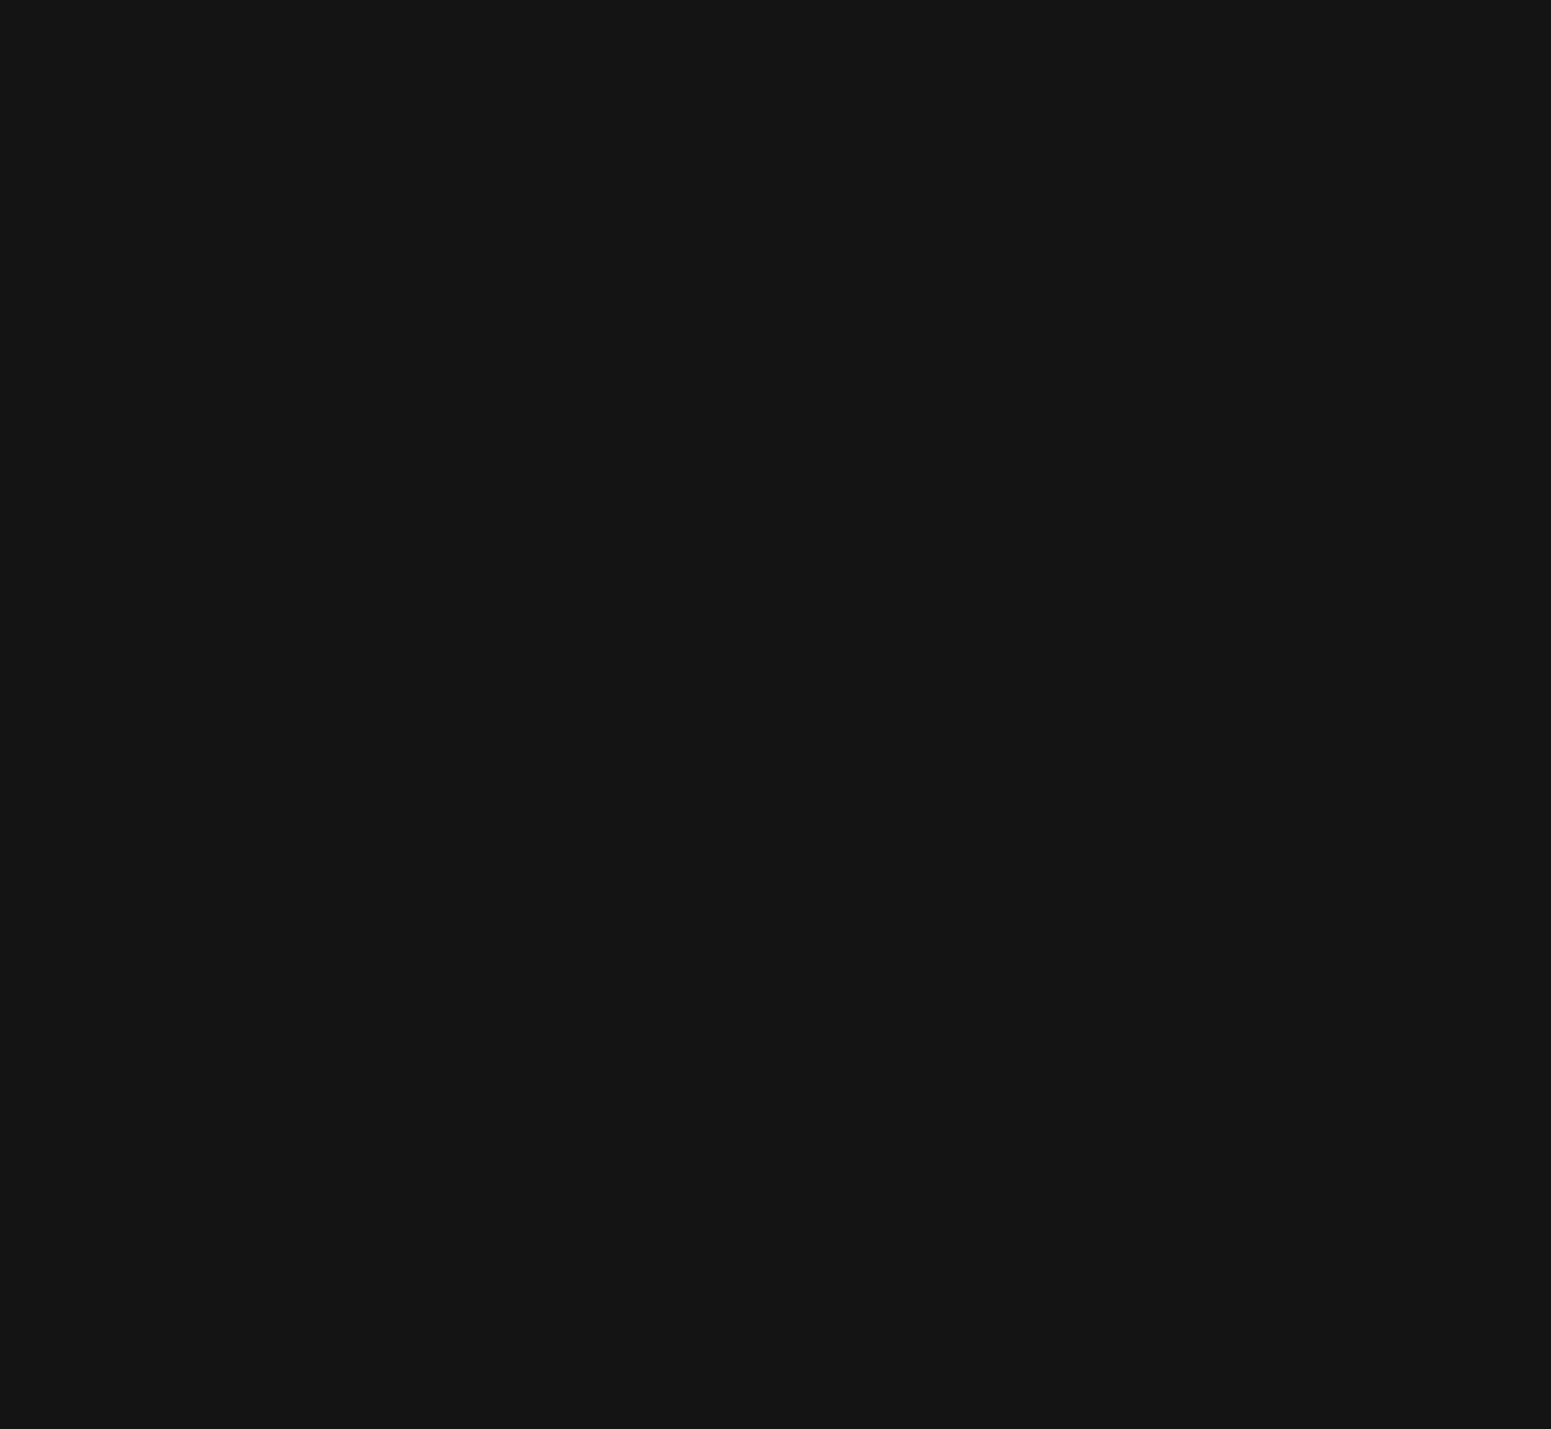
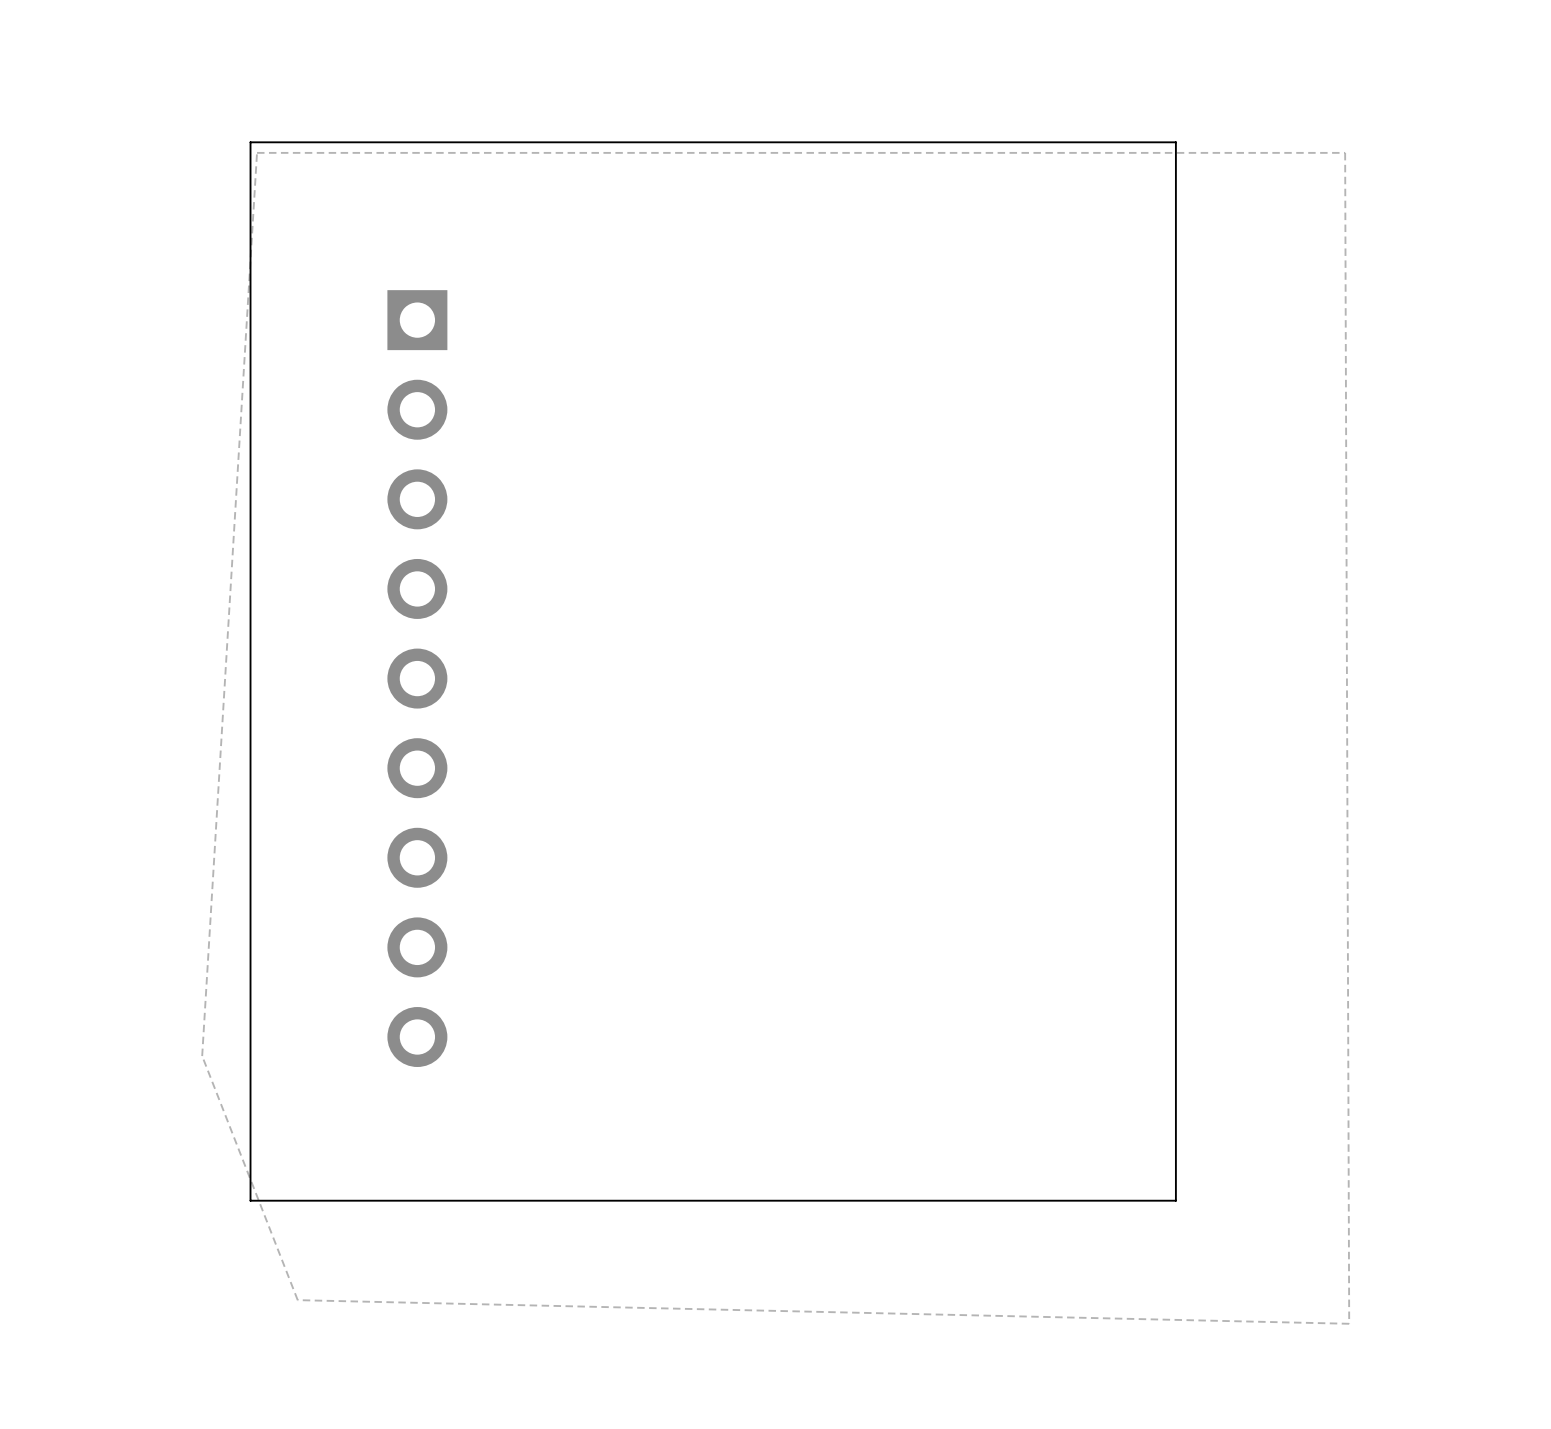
board edge: none -> (1175, 142) (250, 142) (250, 1200) (1175, 1200) (1175, 142)
zone outline: none -> (1345, 152) (257, 152) (202, 1056) (297, 1300) (1349, 1323) (1345, 152)
part: none -> (417, 678)

